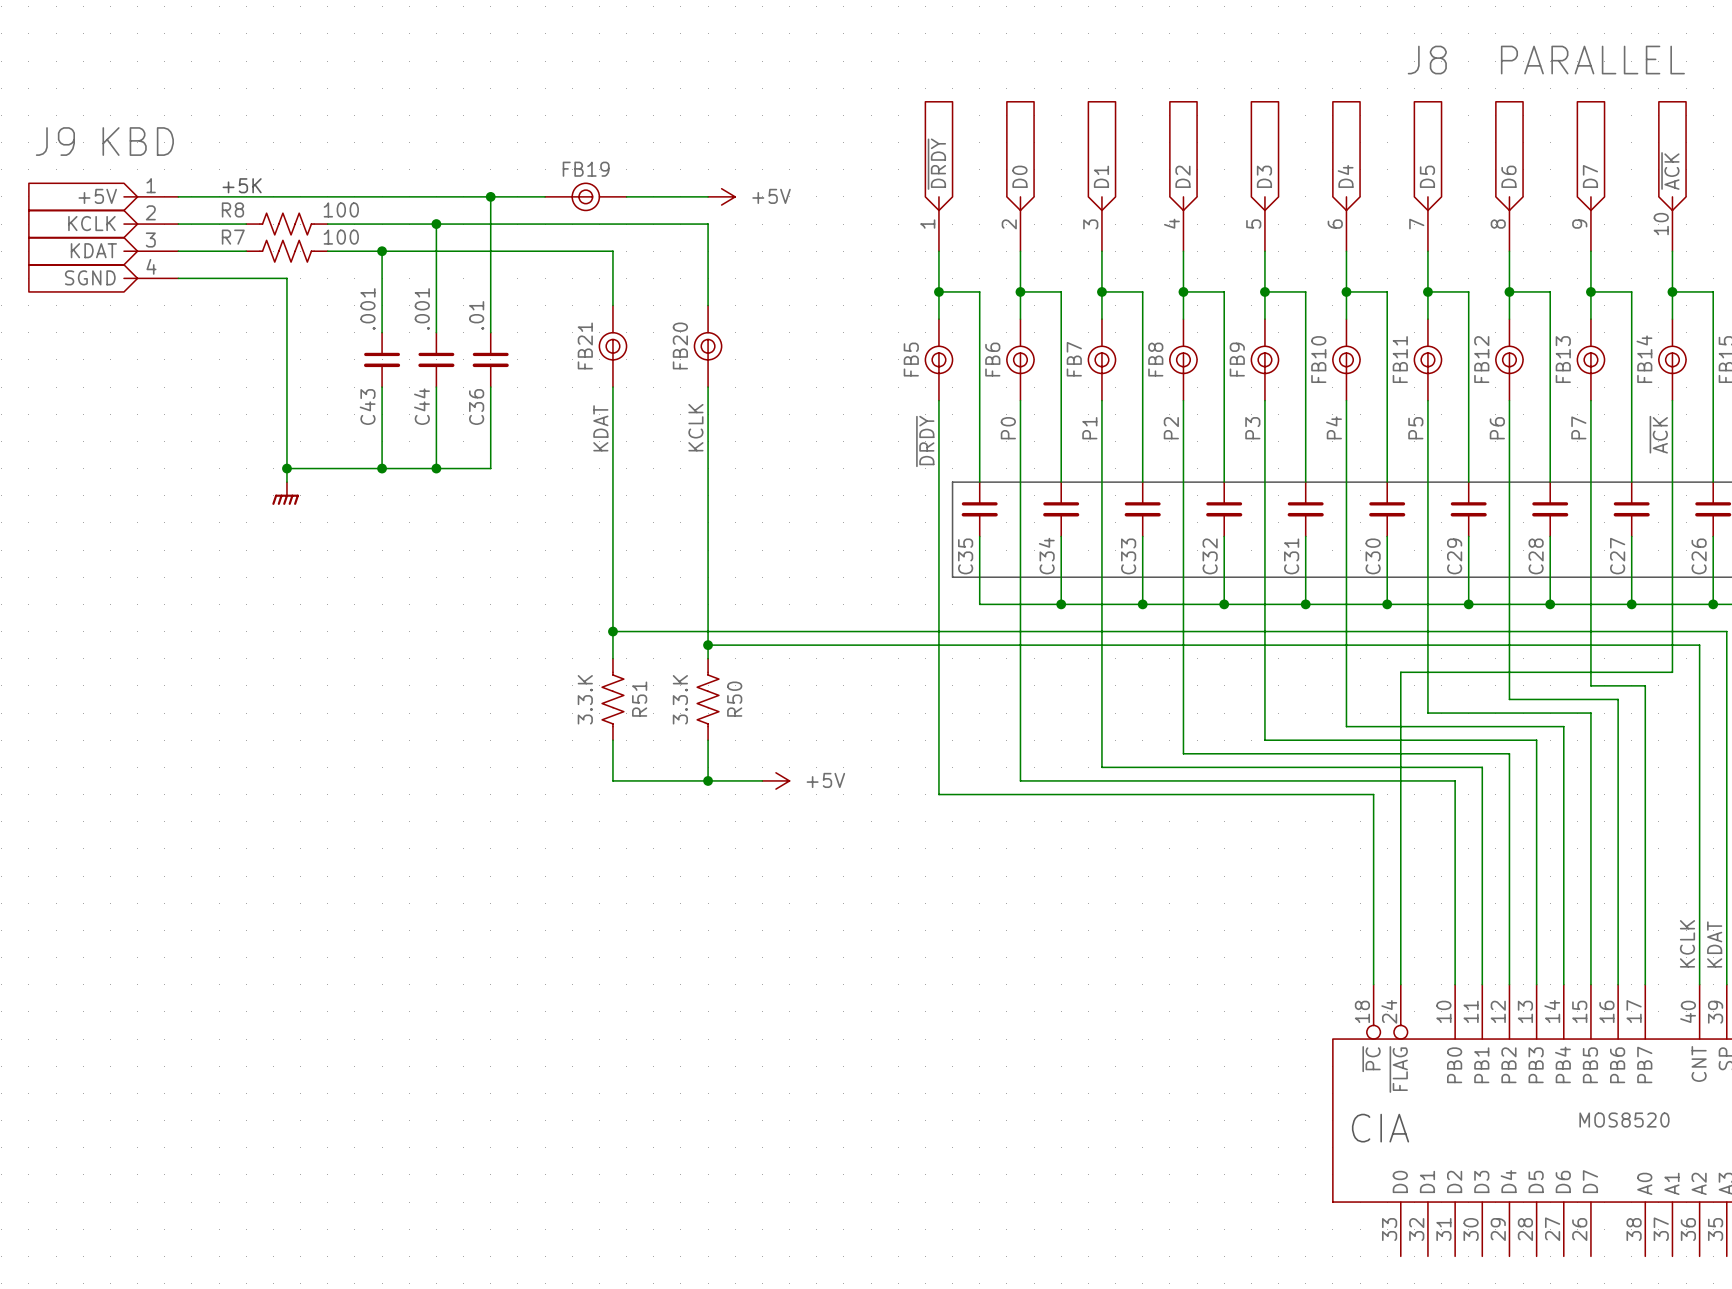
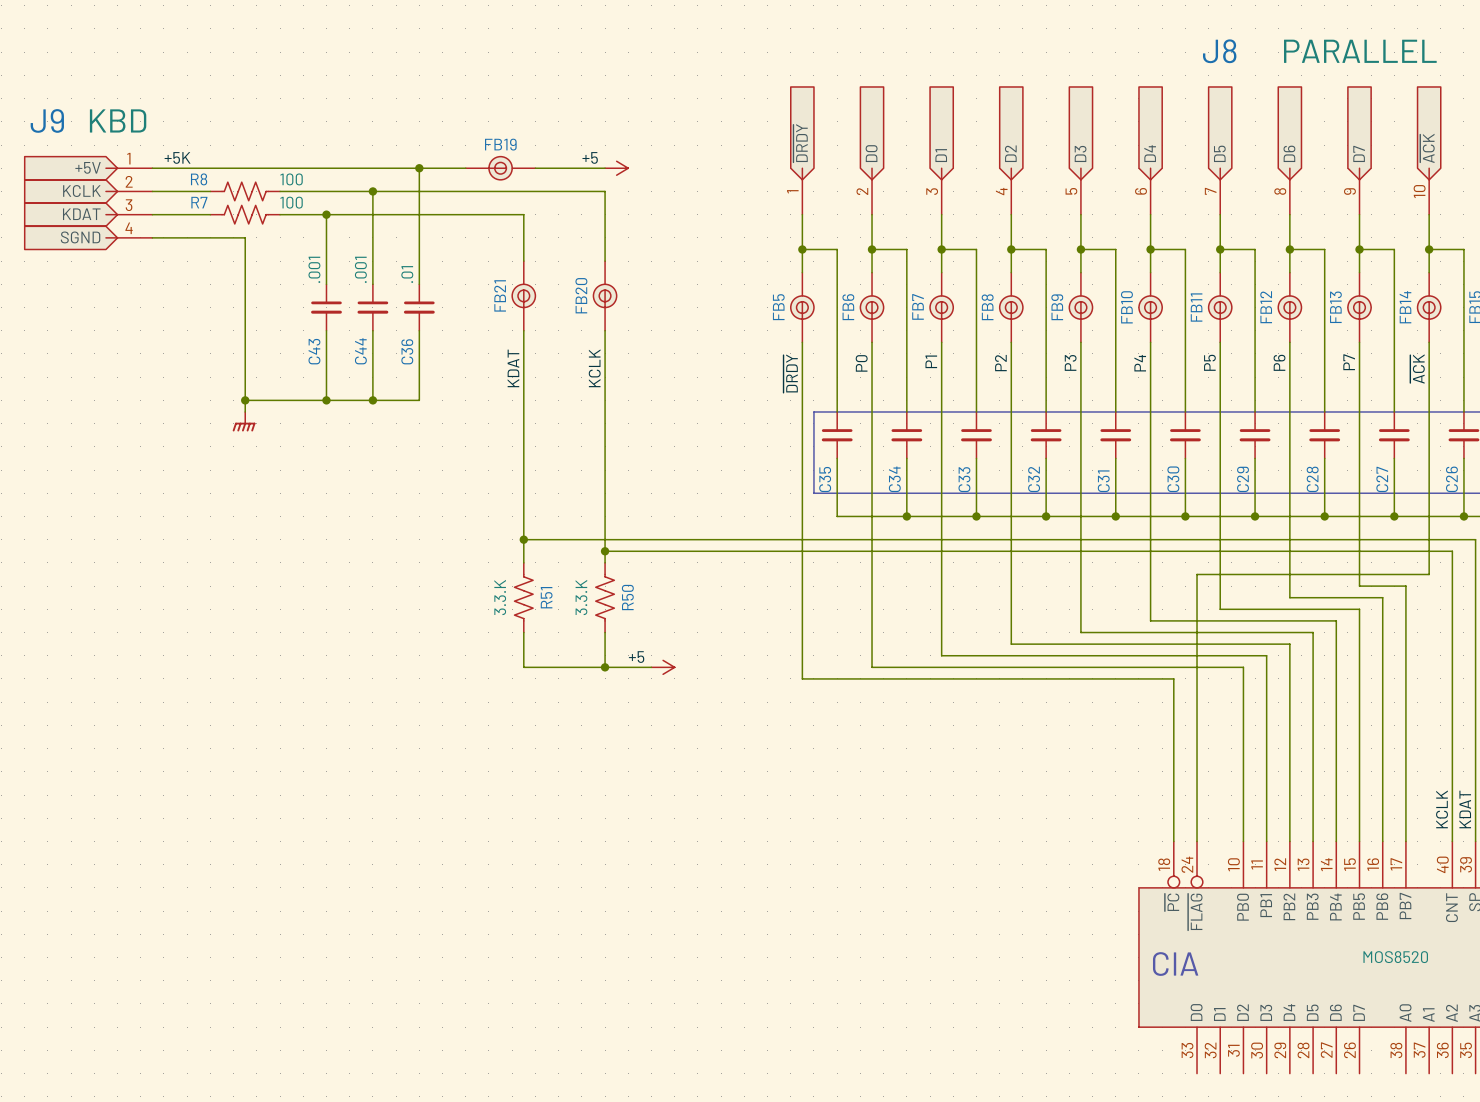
label: none -> +5K (177, 157)
label: none -> +5 (590, 157)
text: +5K (242, 185) -> none
power symbol text: +5V (771, 196) -> none
label: none -> +5 (636, 657)
power symbol text: +5V (825, 780) -> none

